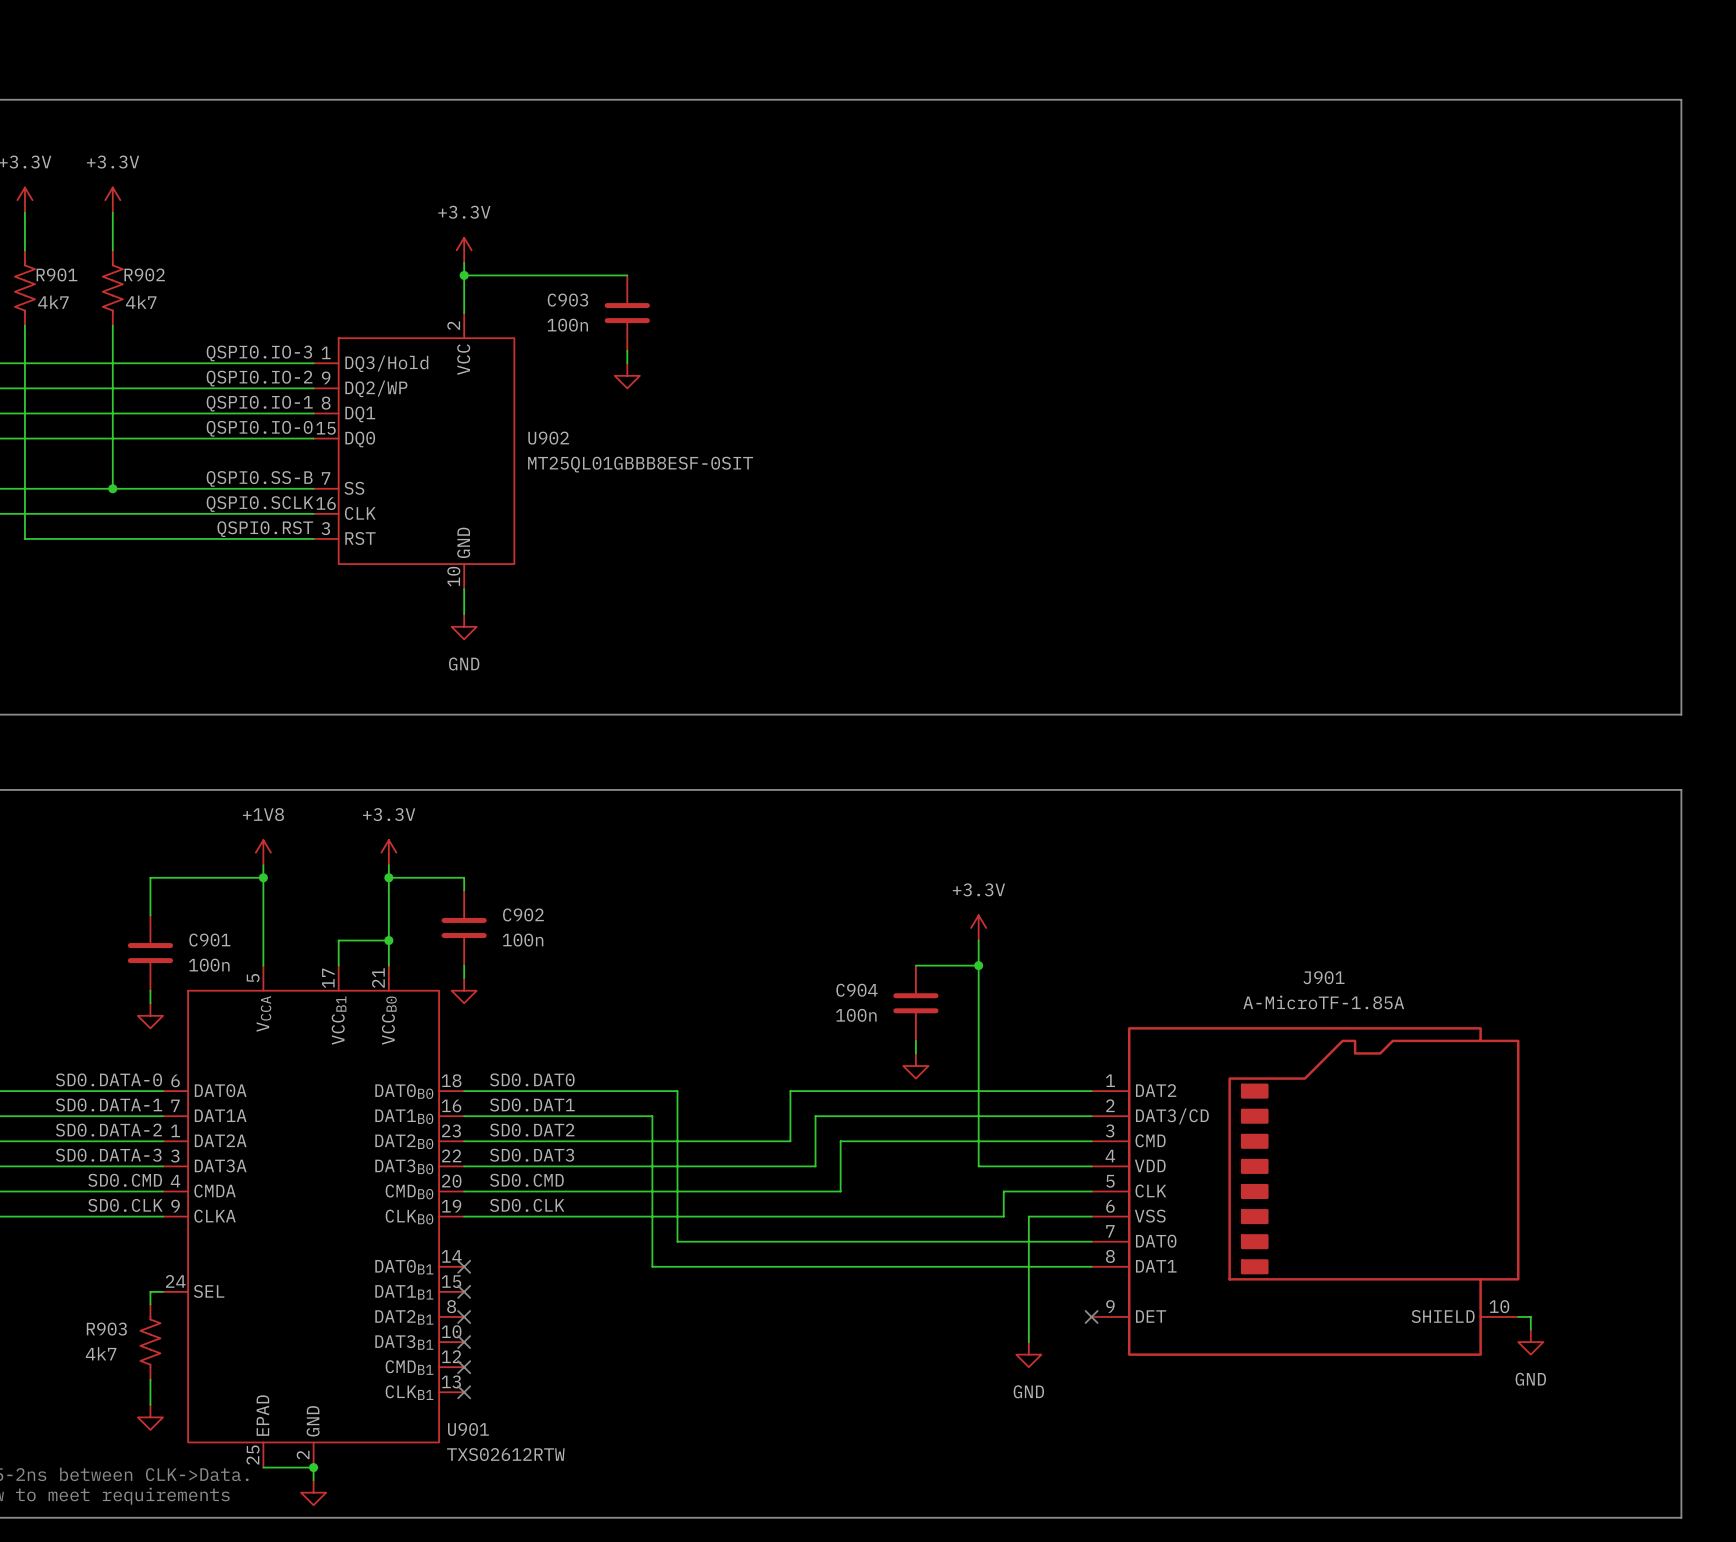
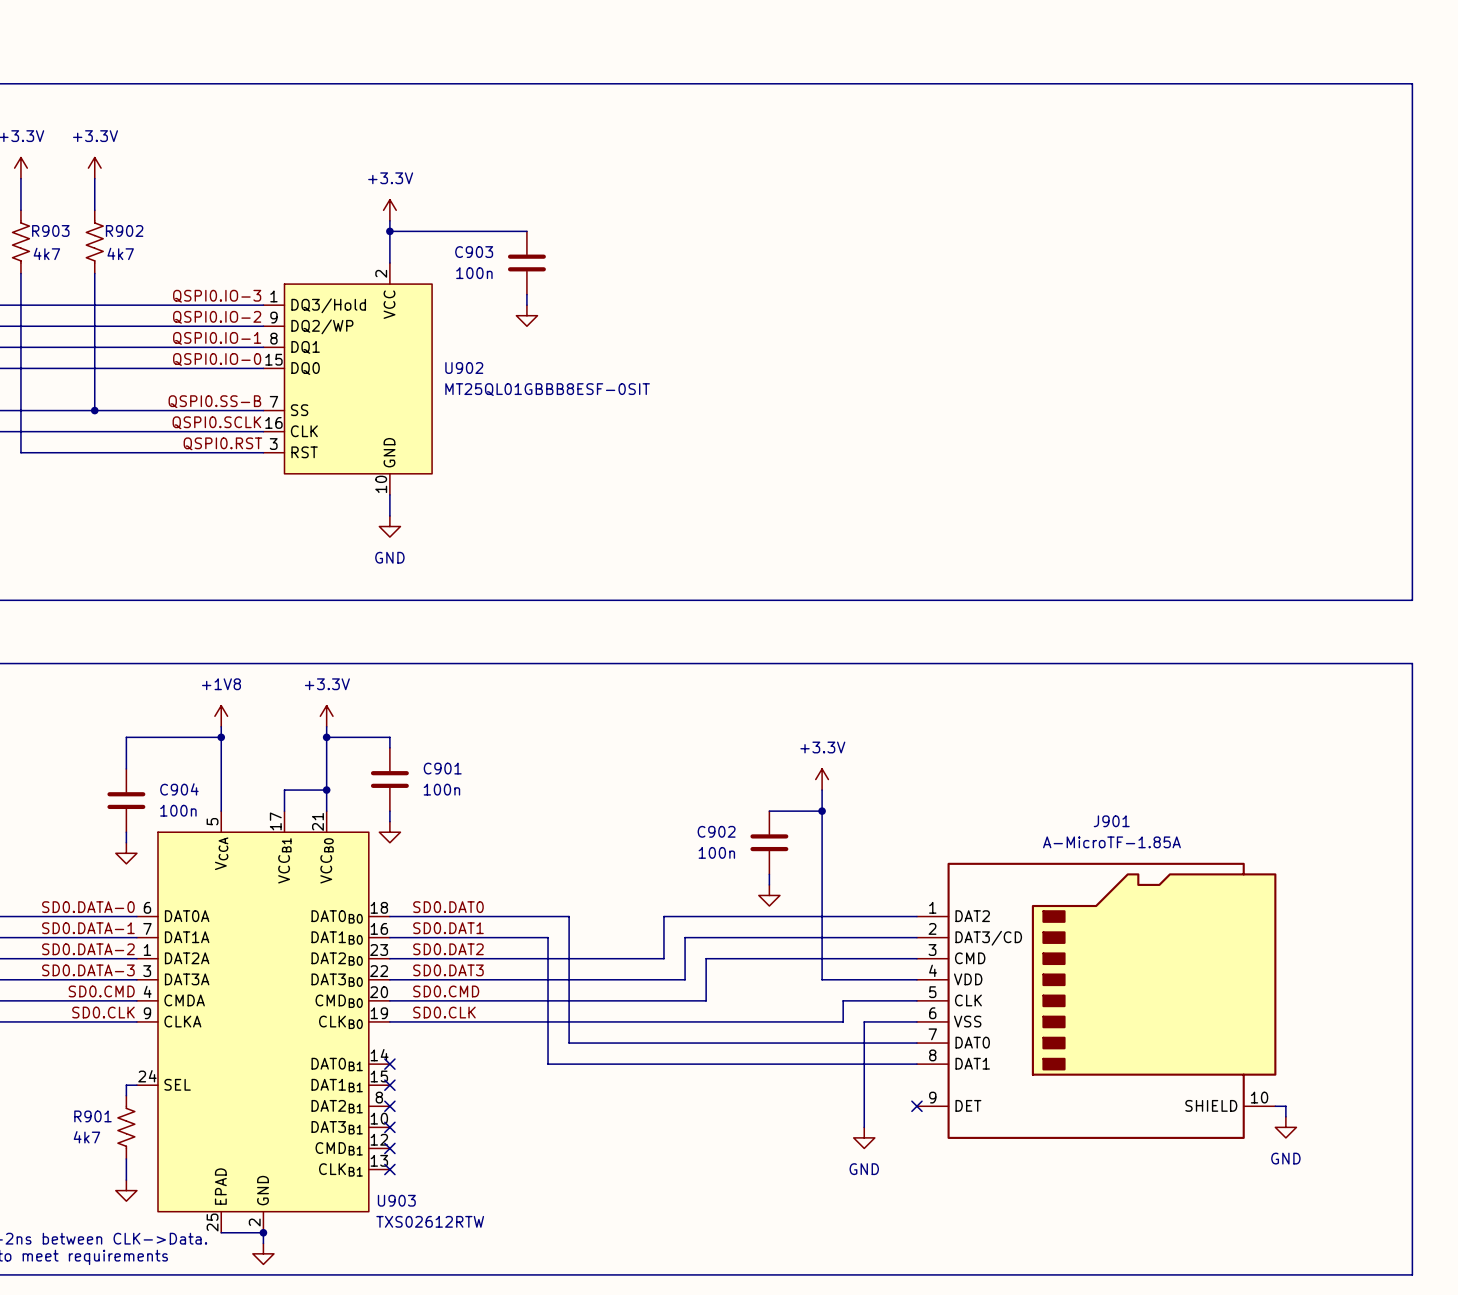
R901 name: R901 (56, 274) -> R903 (50, 230)
C902 name: C902 (523, 914) -> C901 (442, 768)
C901 name: C901 (209, 940) -> C904 (179, 789)
C904 name: C904 (856, 990) -> C902 (716, 831)
R903 name: R903 (106, 1329) -> R901 (92, 1116)
U901 name: U901 (468, 1429) -> U903 (396, 1200)

